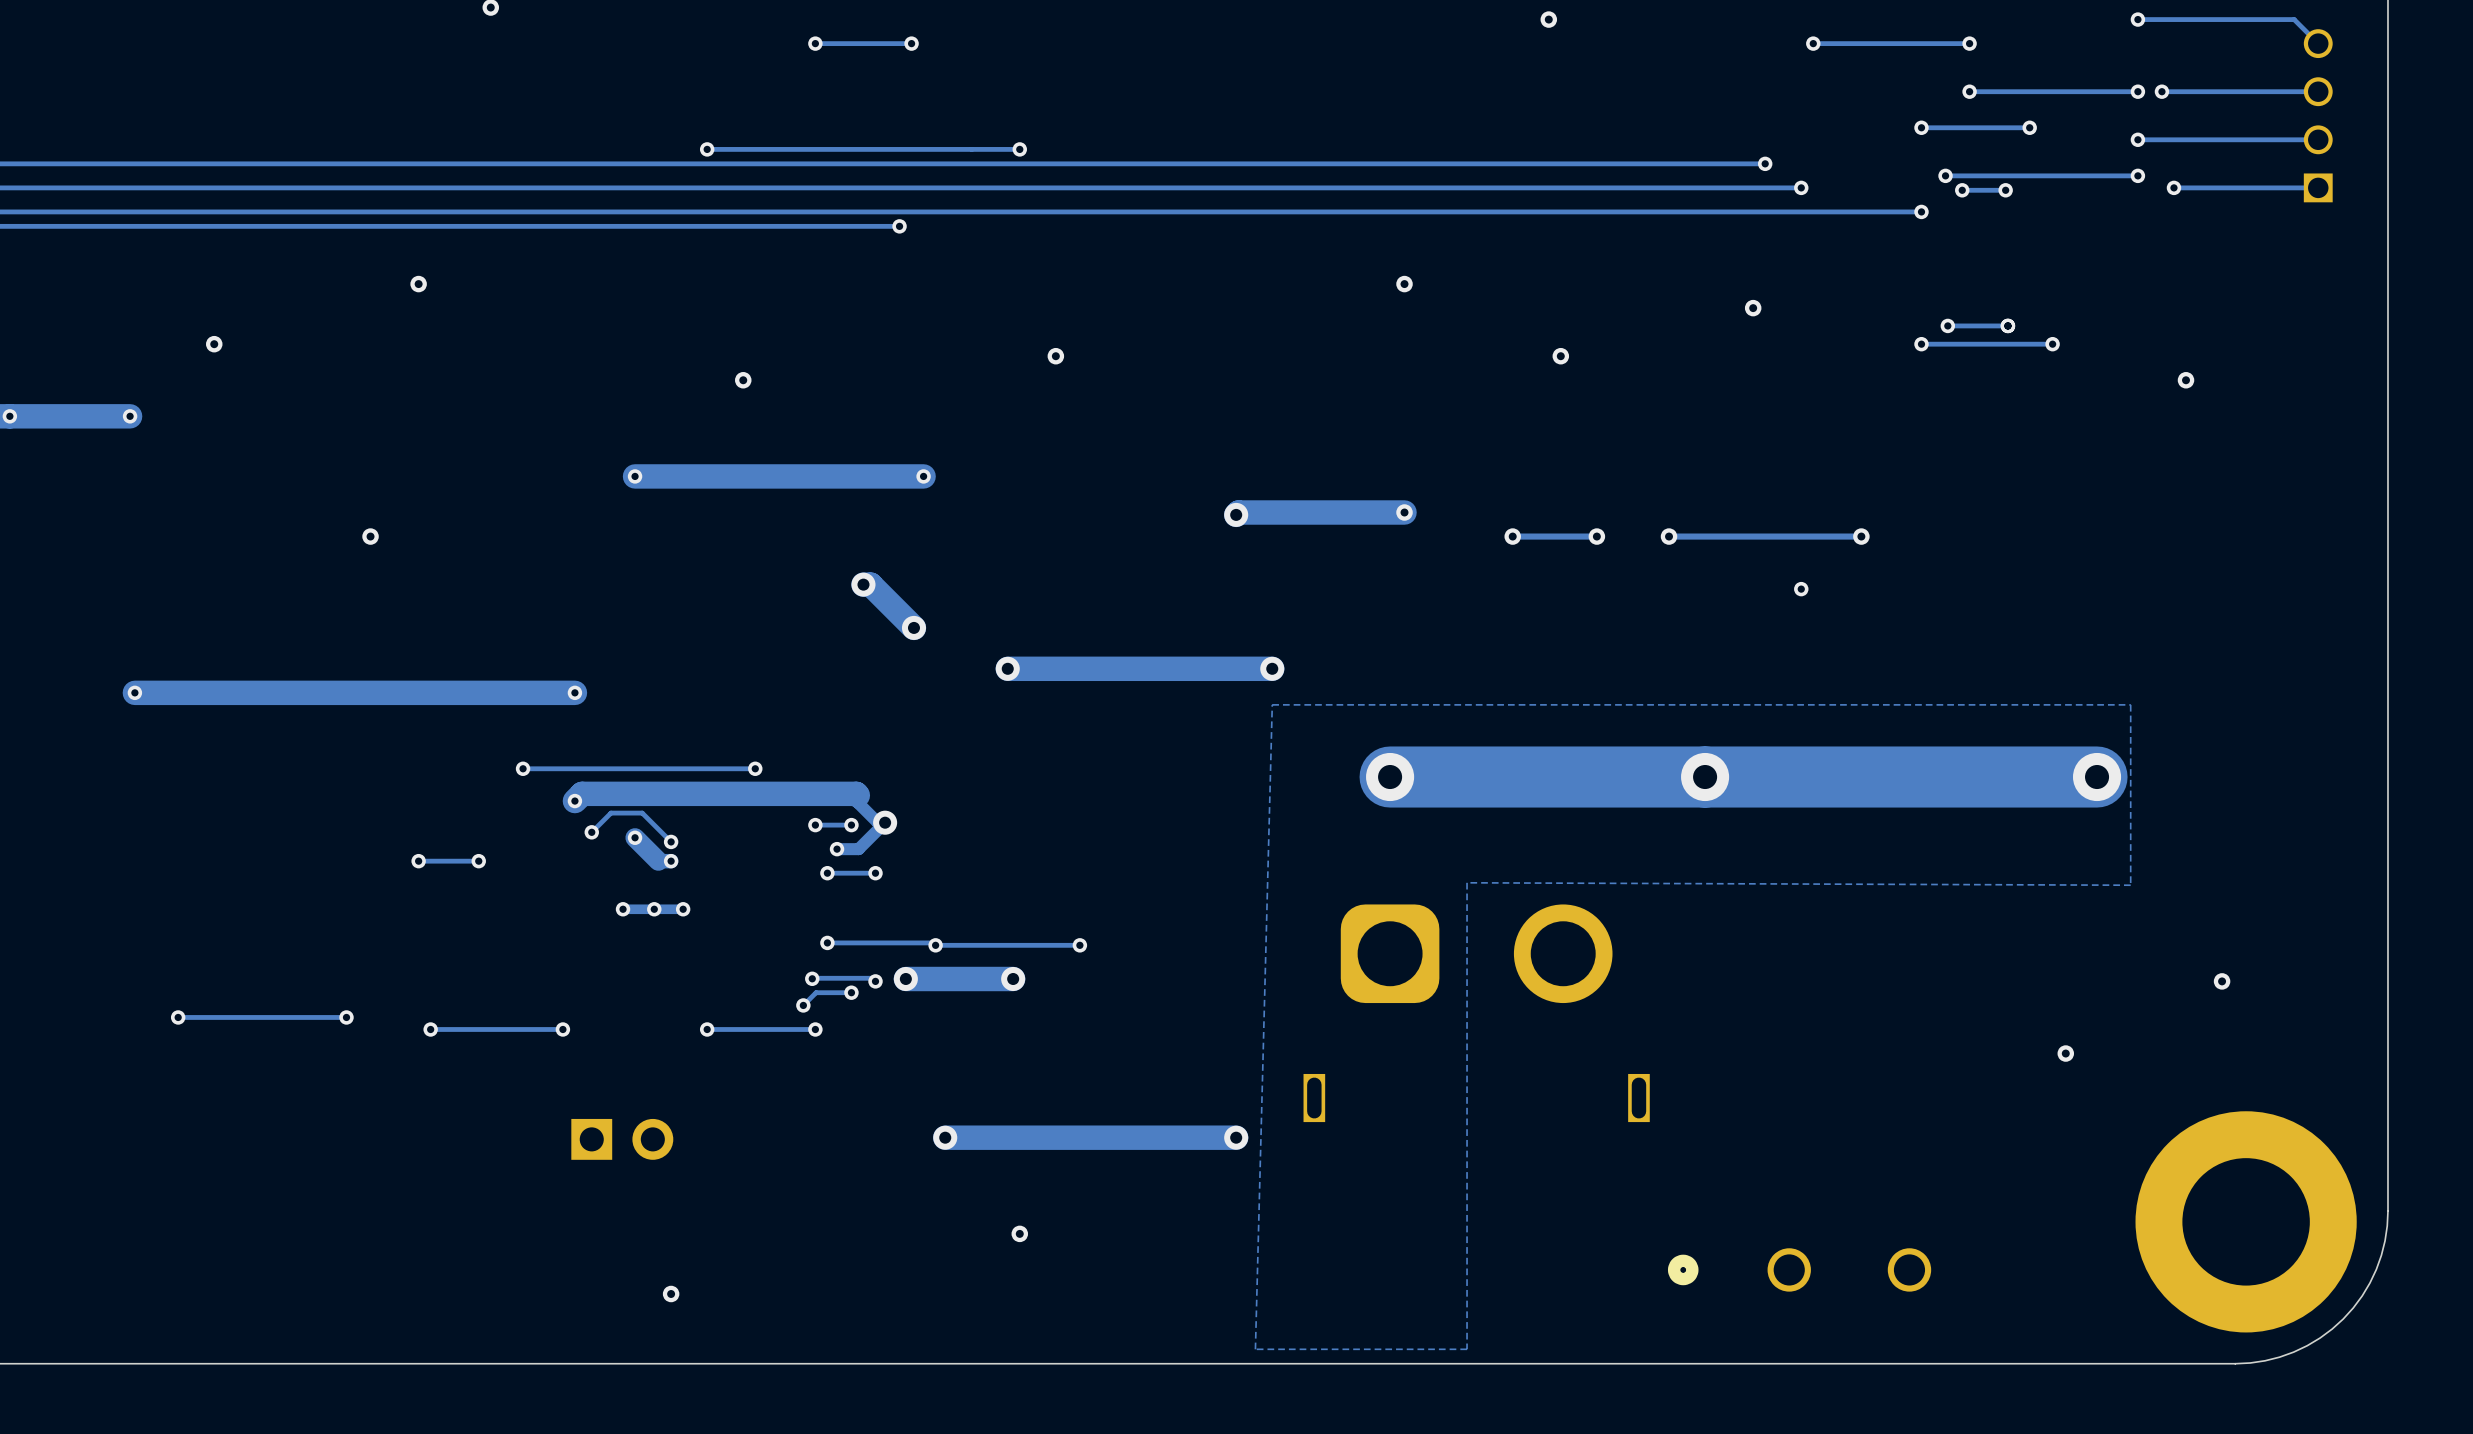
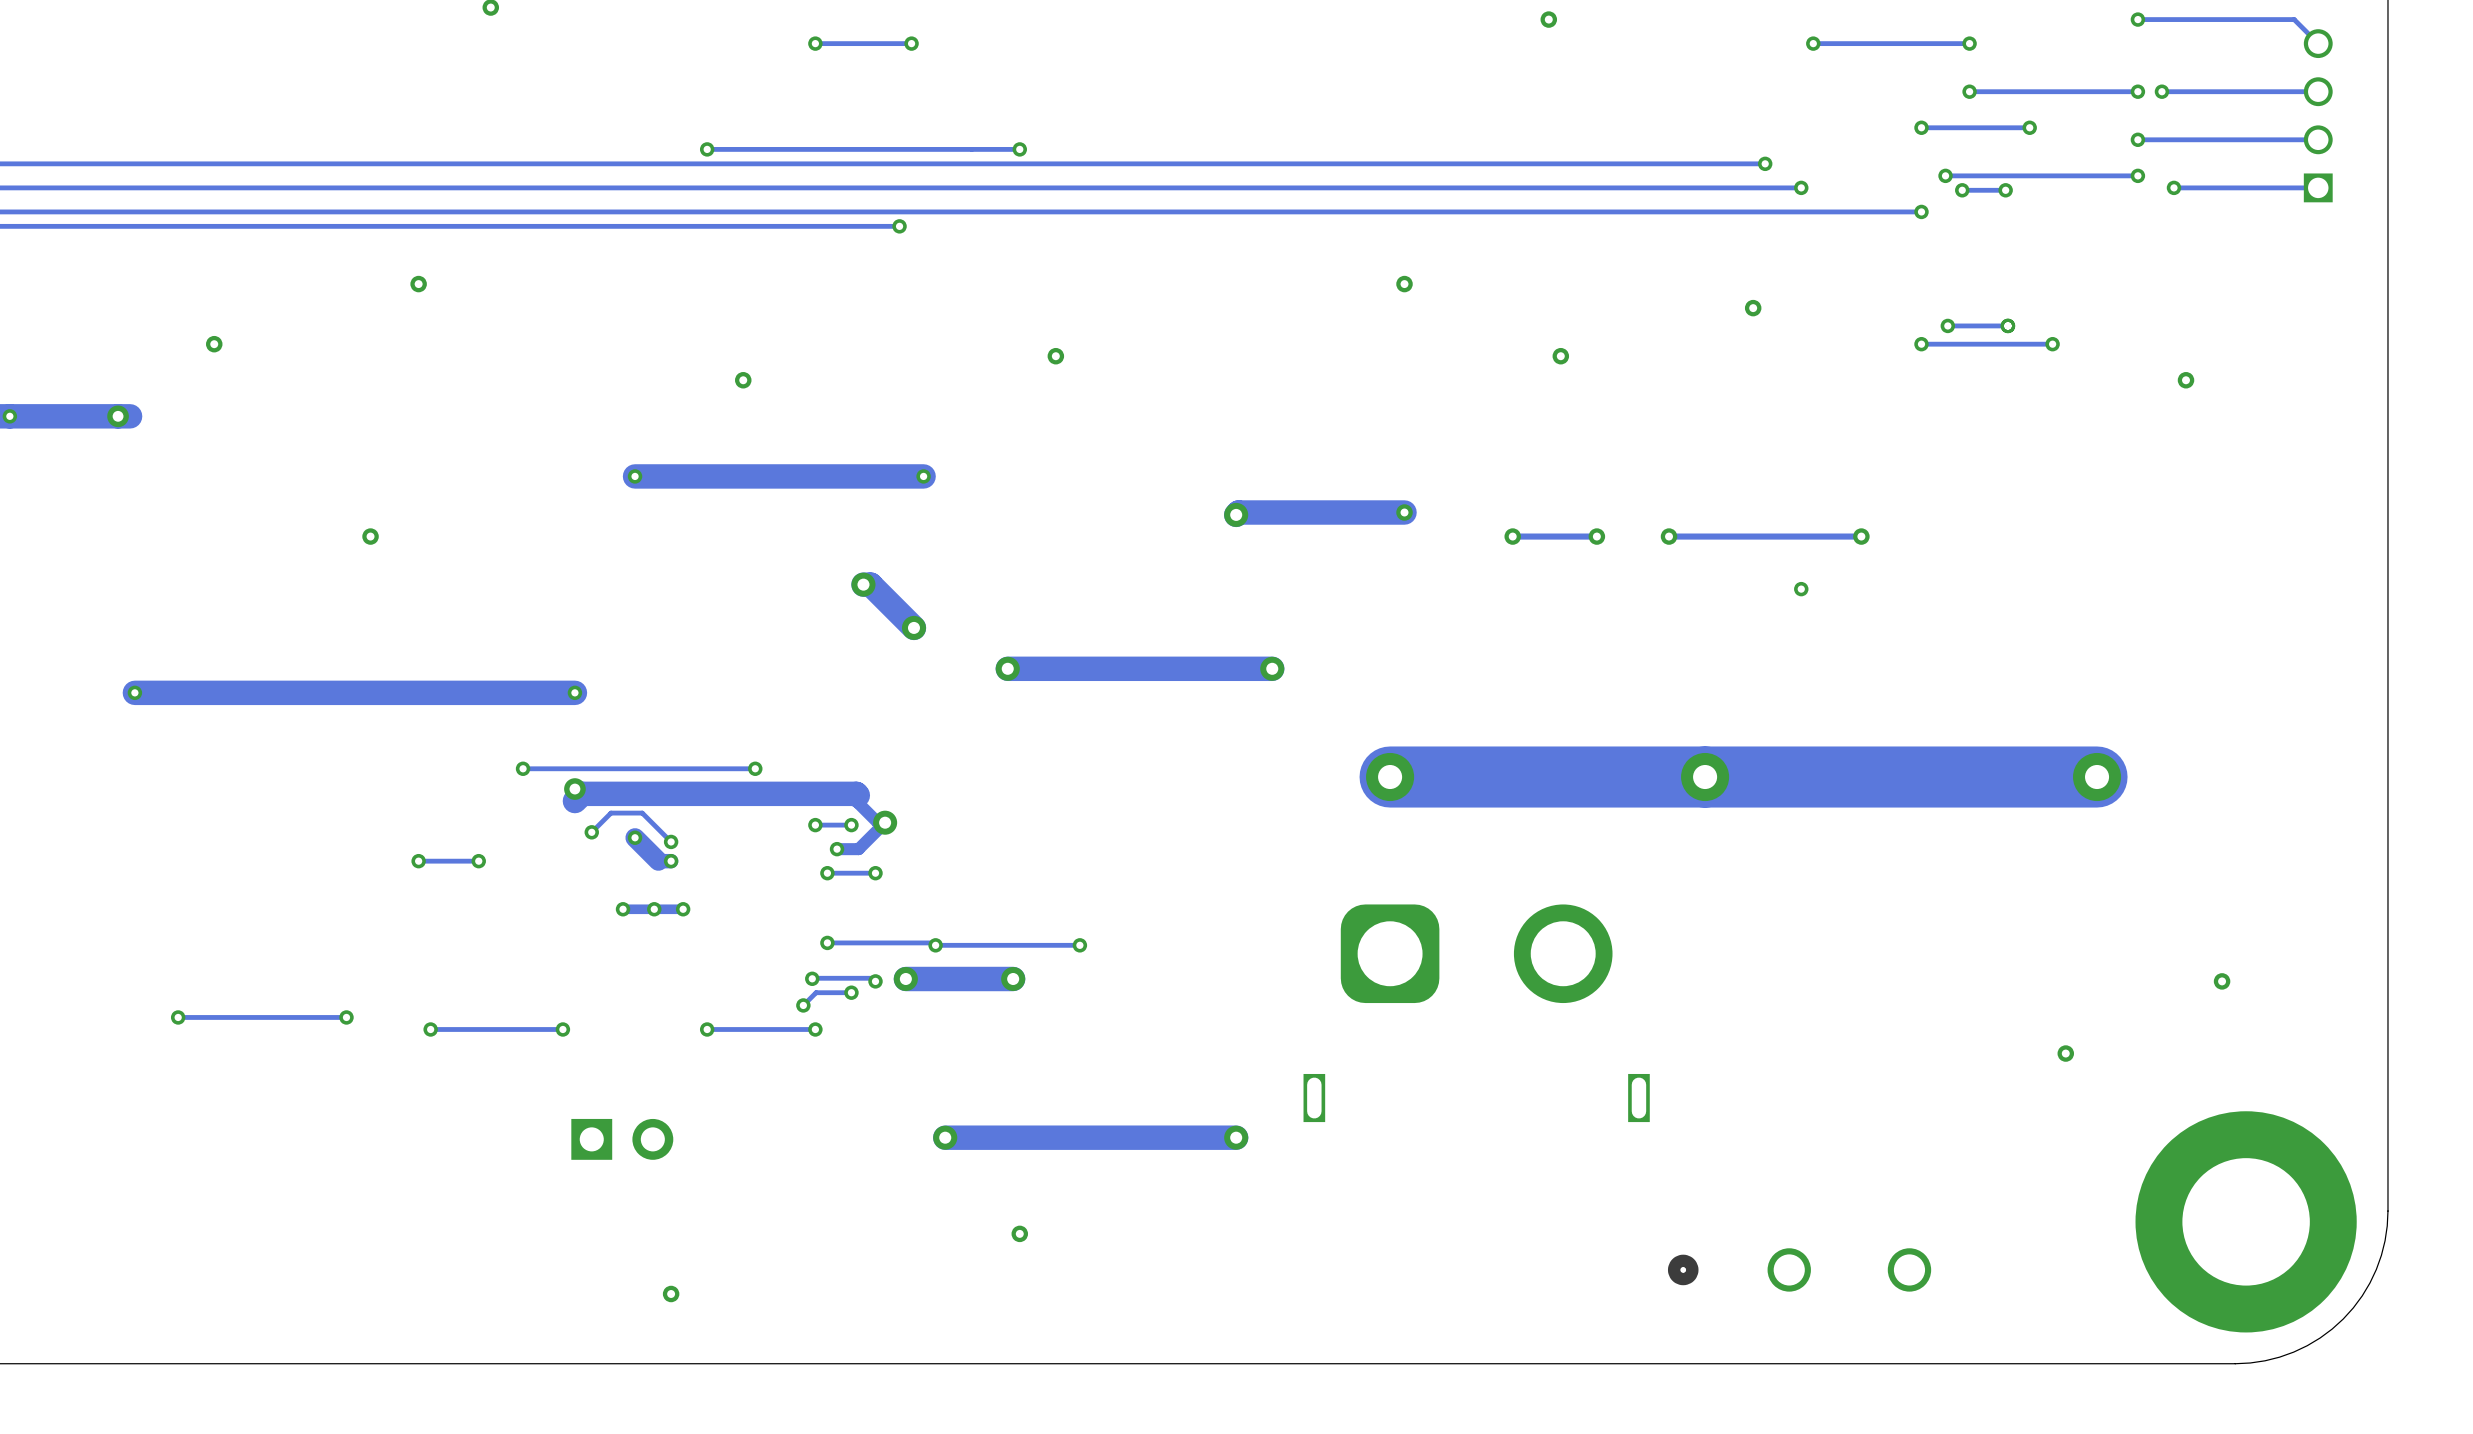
via size: [122, 409, 138, 424] -> [107, 405, 129, 428]
zone outline: (2130, 704) (2130, 885) (1467, 882) (1467, 1349) (1255, 1349) (1272, 704) (2130, 704) -> none
via size: [567, 793, 583, 809] -> [564, 778, 586, 800]

